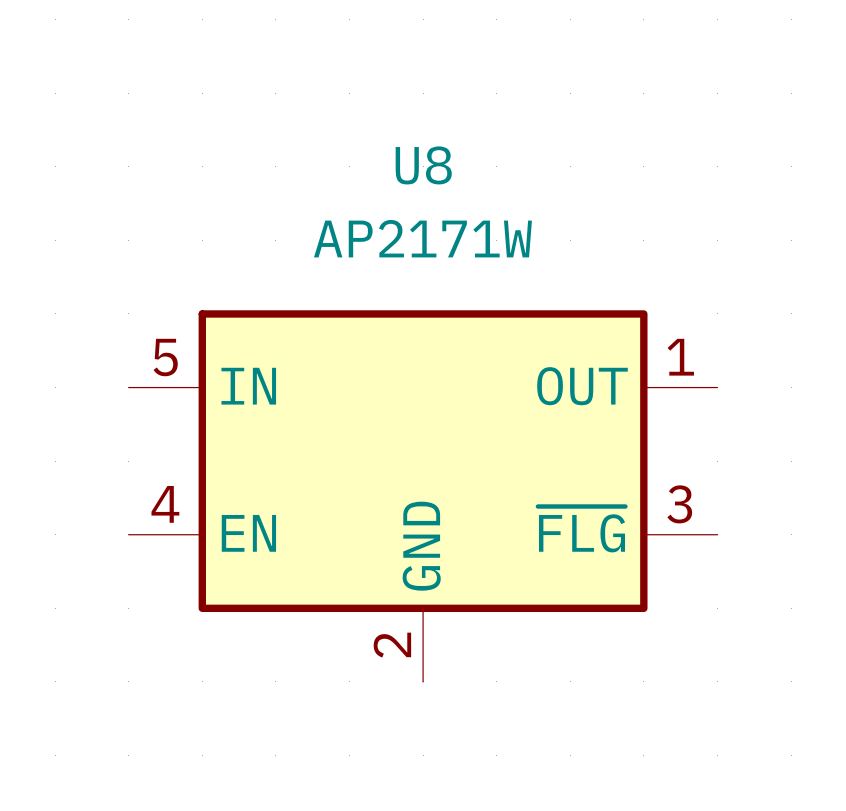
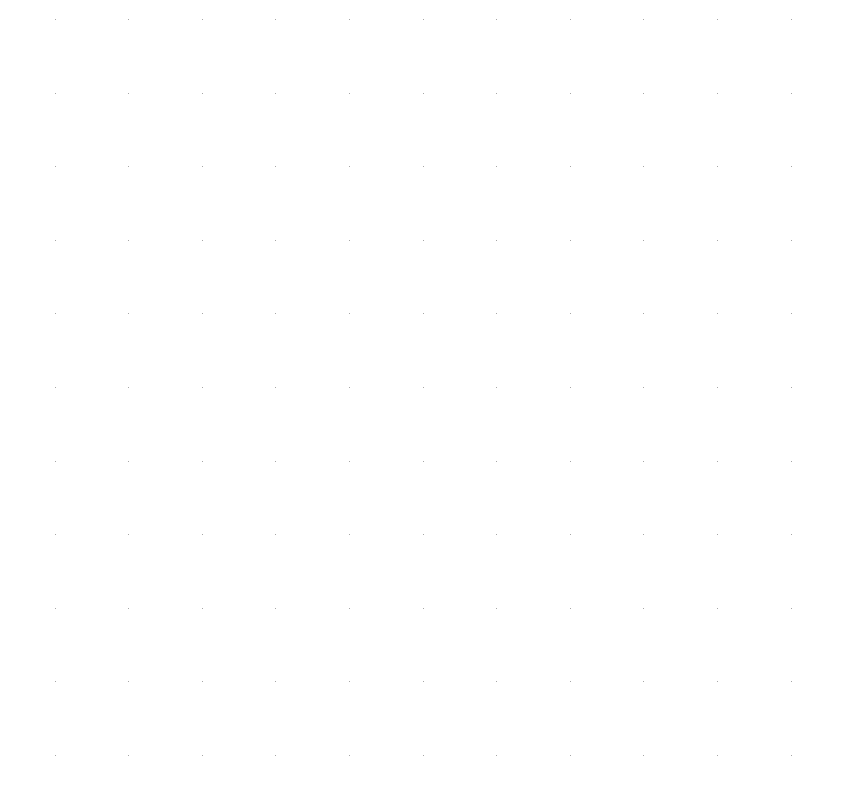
U8: AP2171W (423, 496) -> none

